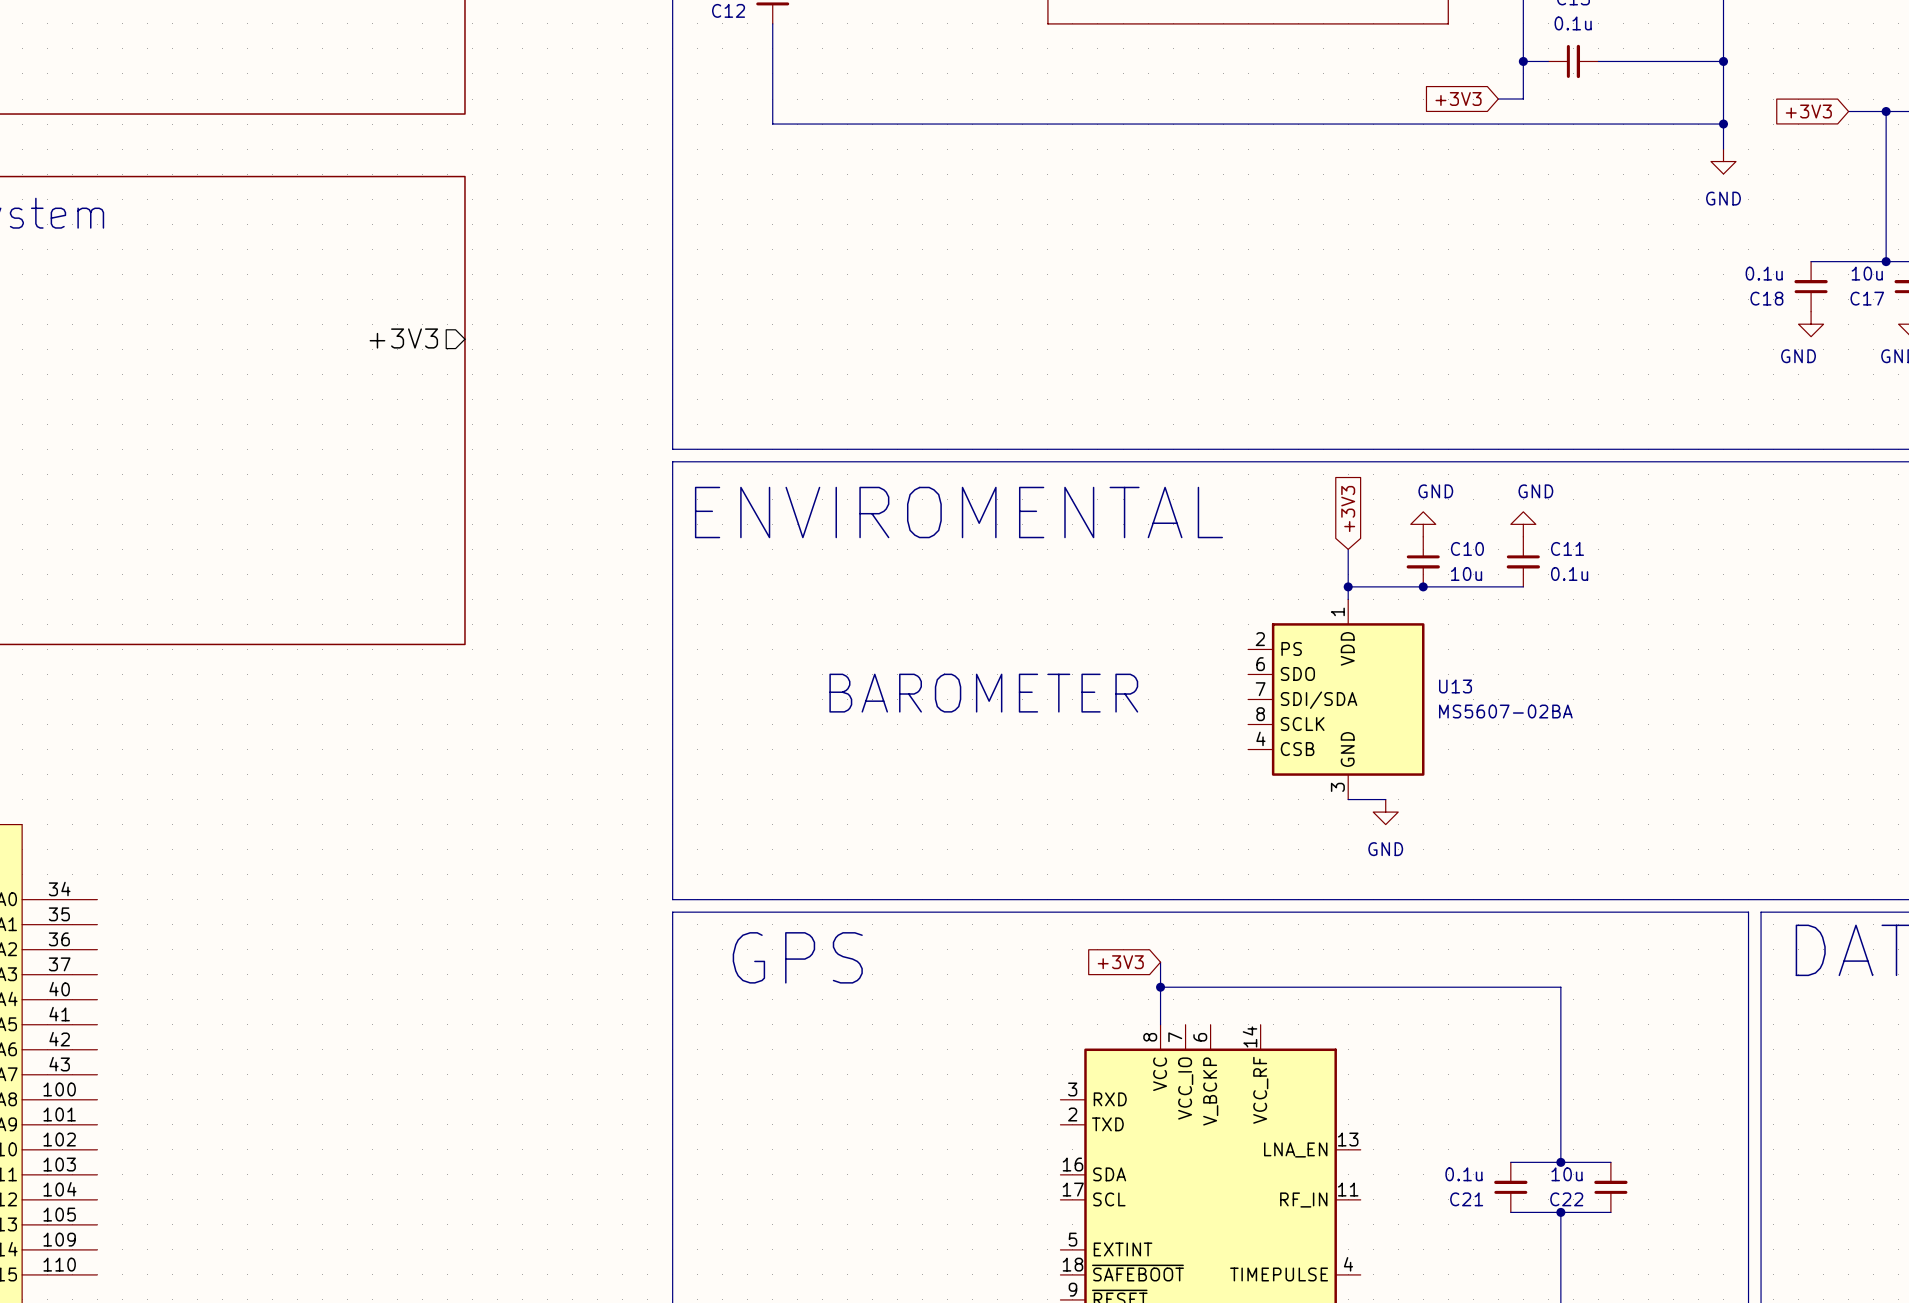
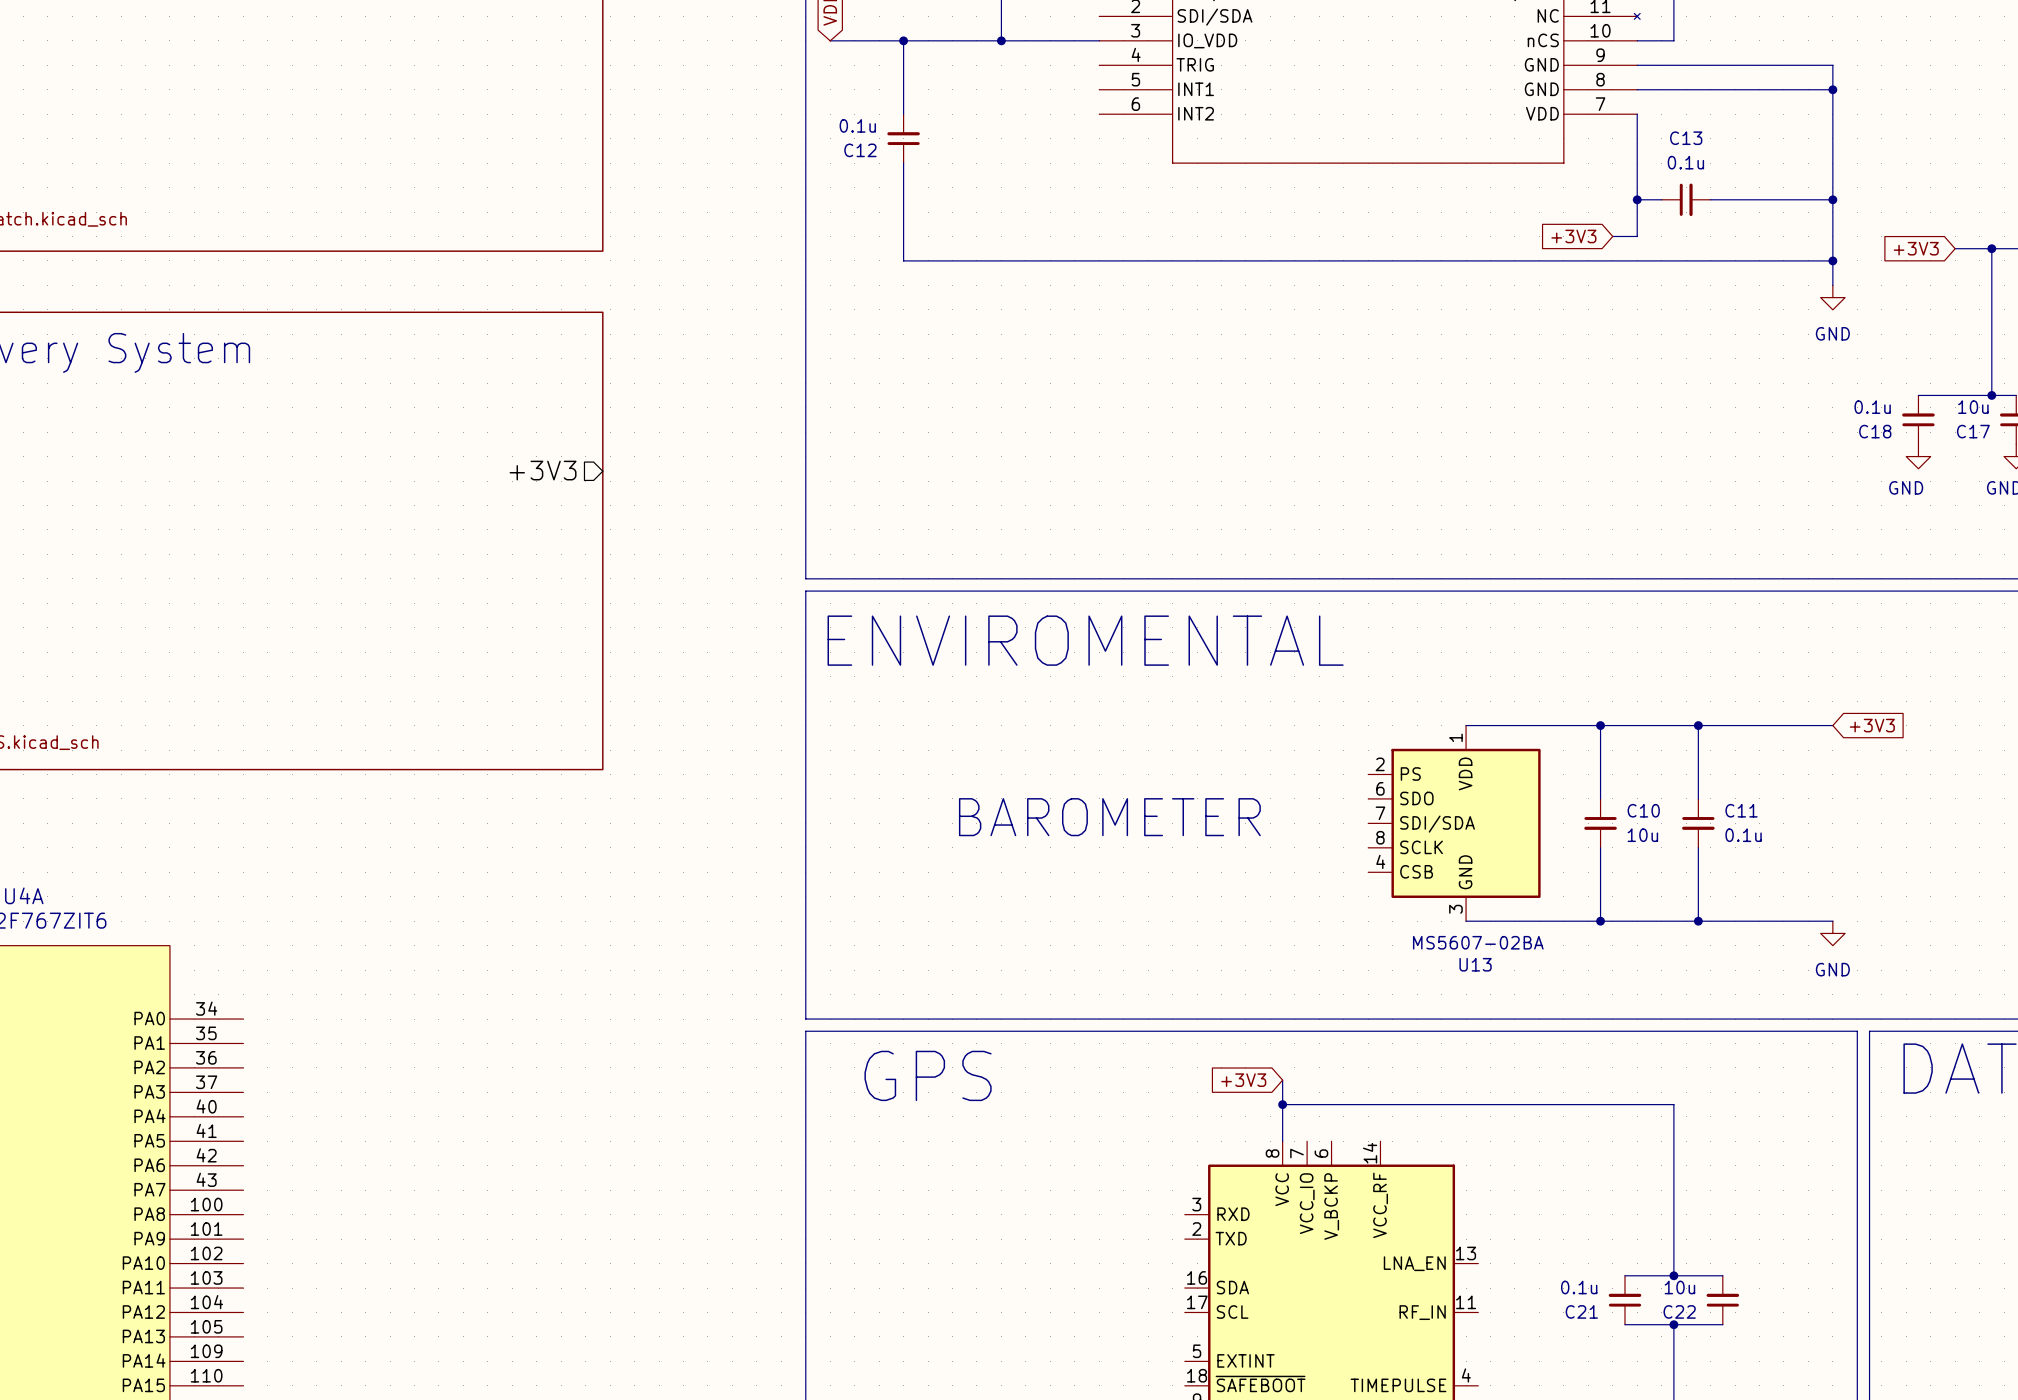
global label: +3V3 (1348, 508) -> none
power symbol: GND (1423, 524) -> none
power symbol: GND (1523, 524) -> none
wire: (1348, 549) (1348, 599) -> (1832, 725) (1466, 725)
C10 position: (1423, 561) -> (1600, 823)
C11 position: (1523, 561) -> (1698, 823)
wire: (1348, 586) (1523, 586) -> none
junction: (1348, 586) -> none
junction: (1423, 586) -> none
wire: none -> (1600, 725) (1600, 798)
junction: none -> (1600, 725)
wire: none -> (1698, 725) (1698, 798)
junction: none -> (1698, 725)
global label: none -> +3V3 (1872, 725)
U13 name position: U13 (1455, 686) -> U13 (1475, 964)
U13 value position: MS5607-02BA (1505, 711) -> MS5607-02BA (1478, 942)
wire: none -> (1600, 847) (1600, 921)
wire: none -> (1698, 847) (1698, 921)
wire: none -> (1502, 921) (1832, 921)
junction: none -> (1600, 921)
junction: none -> (1698, 921)
power symbol: GND (1385, 812) -> none
power symbol: none -> GND (1832, 933)

